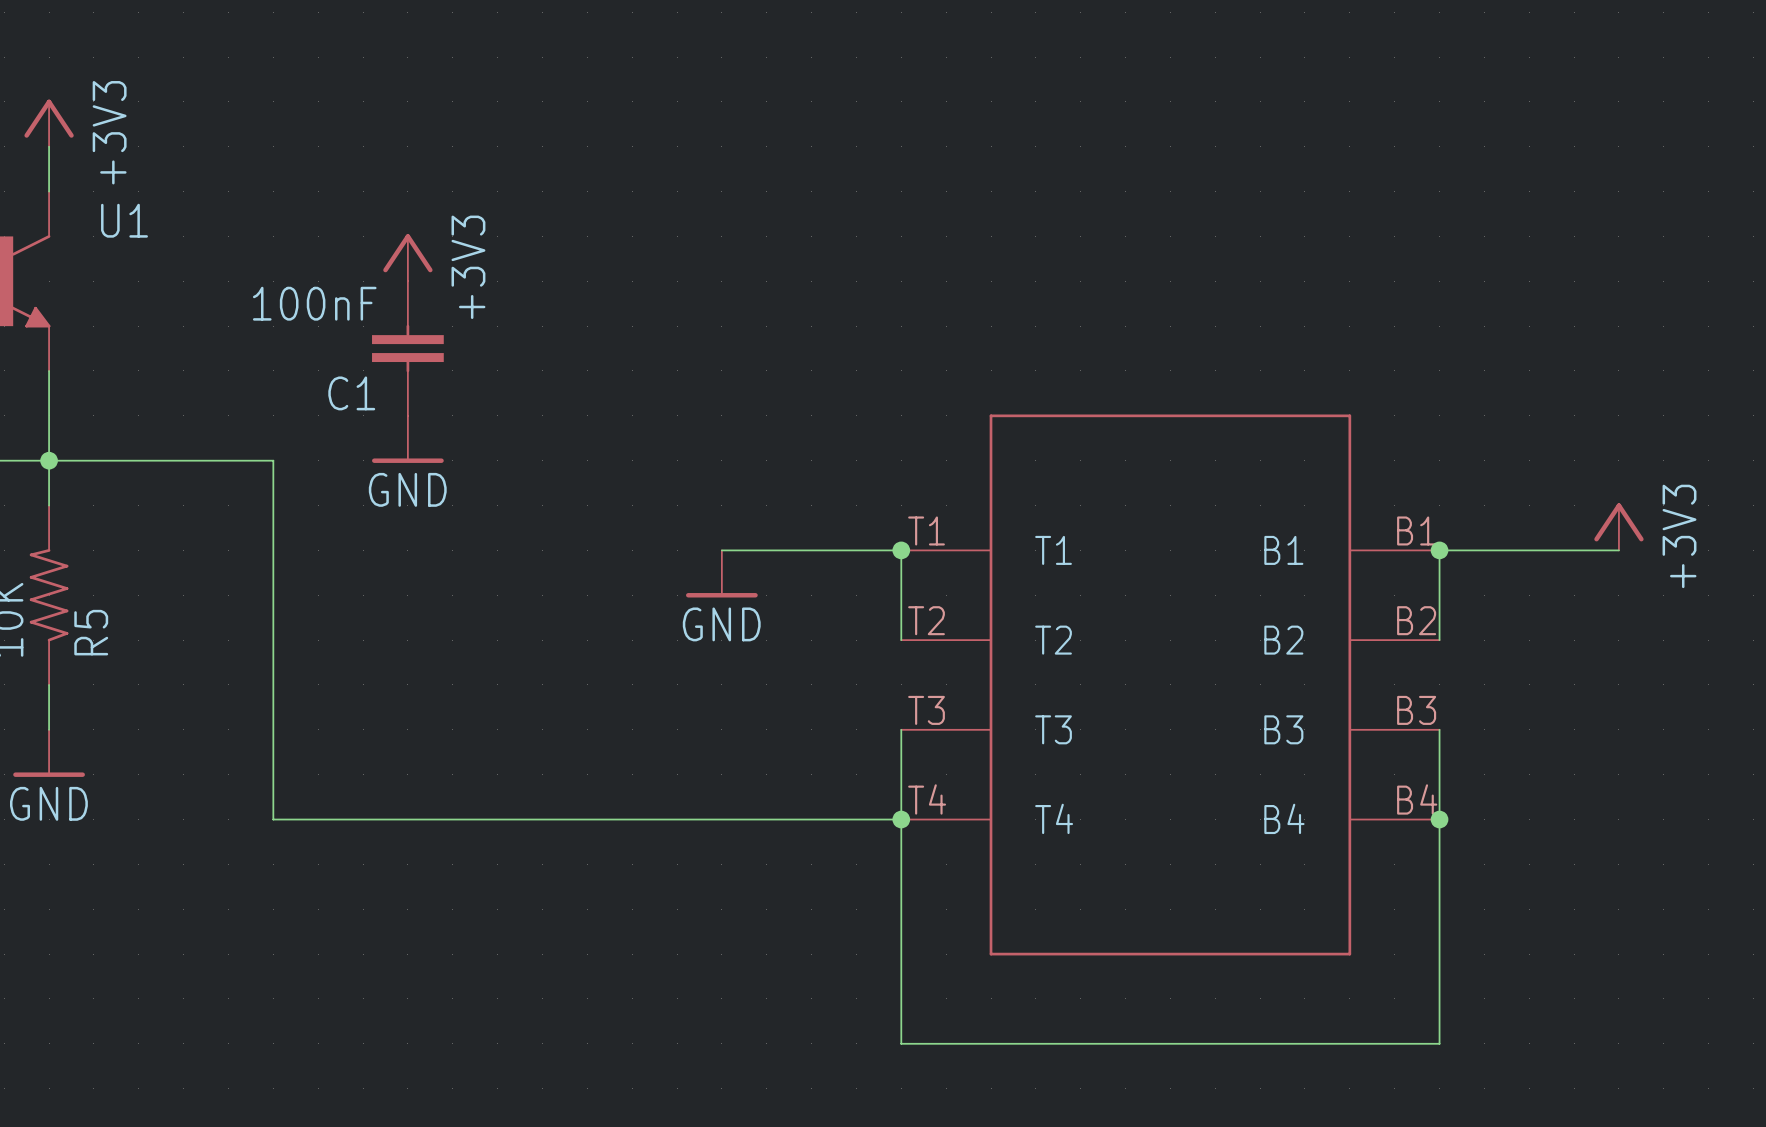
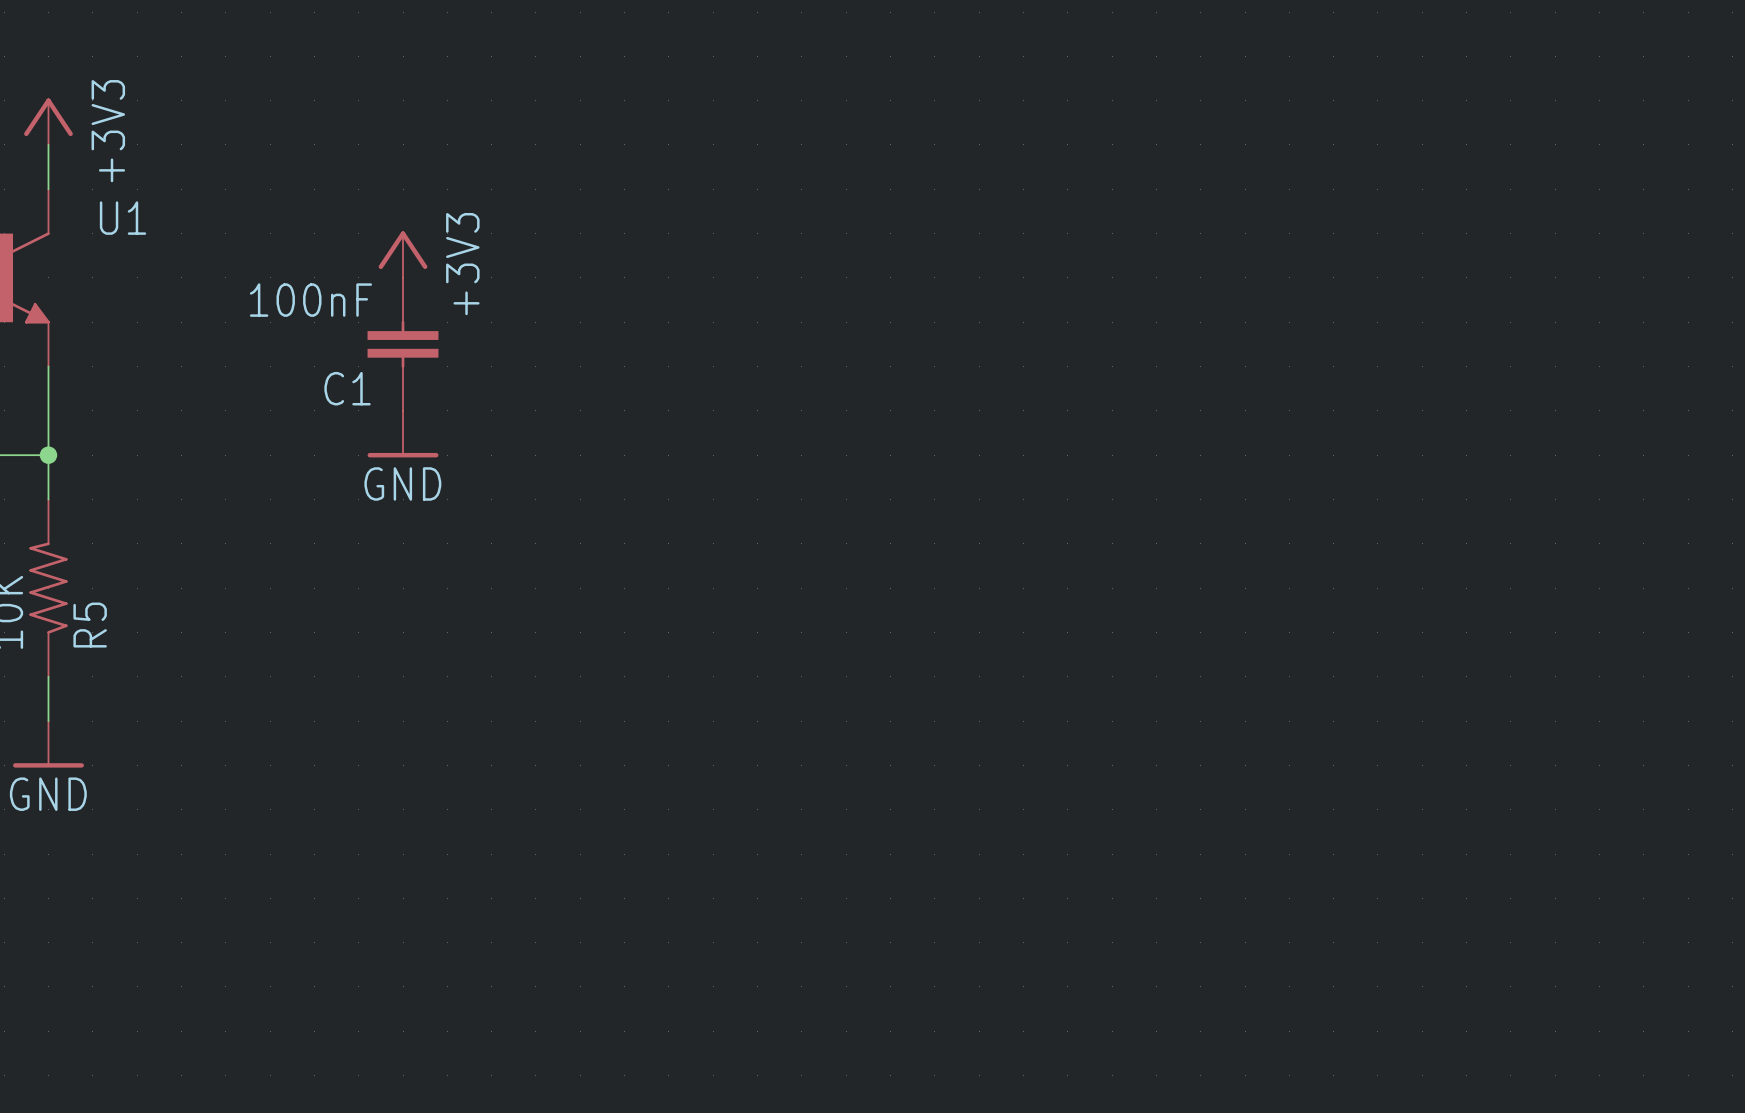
wire: (49, 460) (273, 460) (273, 819) (901, 819) -> none
power symbol: +3V3 (1618, 526) -> none
wire: (721, 550) (901, 550) (901, 640) -> none
junction: (901, 550) -> none
junction: (1439, 550) -> none
wire: (1618, 550) (1439, 550) (1439, 640) -> none
power symbol: GND (721, 573) -> none
part: (1170, 684) -> none
wire: (901, 729) (901, 1043) (1439, 1043) (1439, 729) -> none
junction: (901, 819) -> none
junction: (1439, 819) -> none

